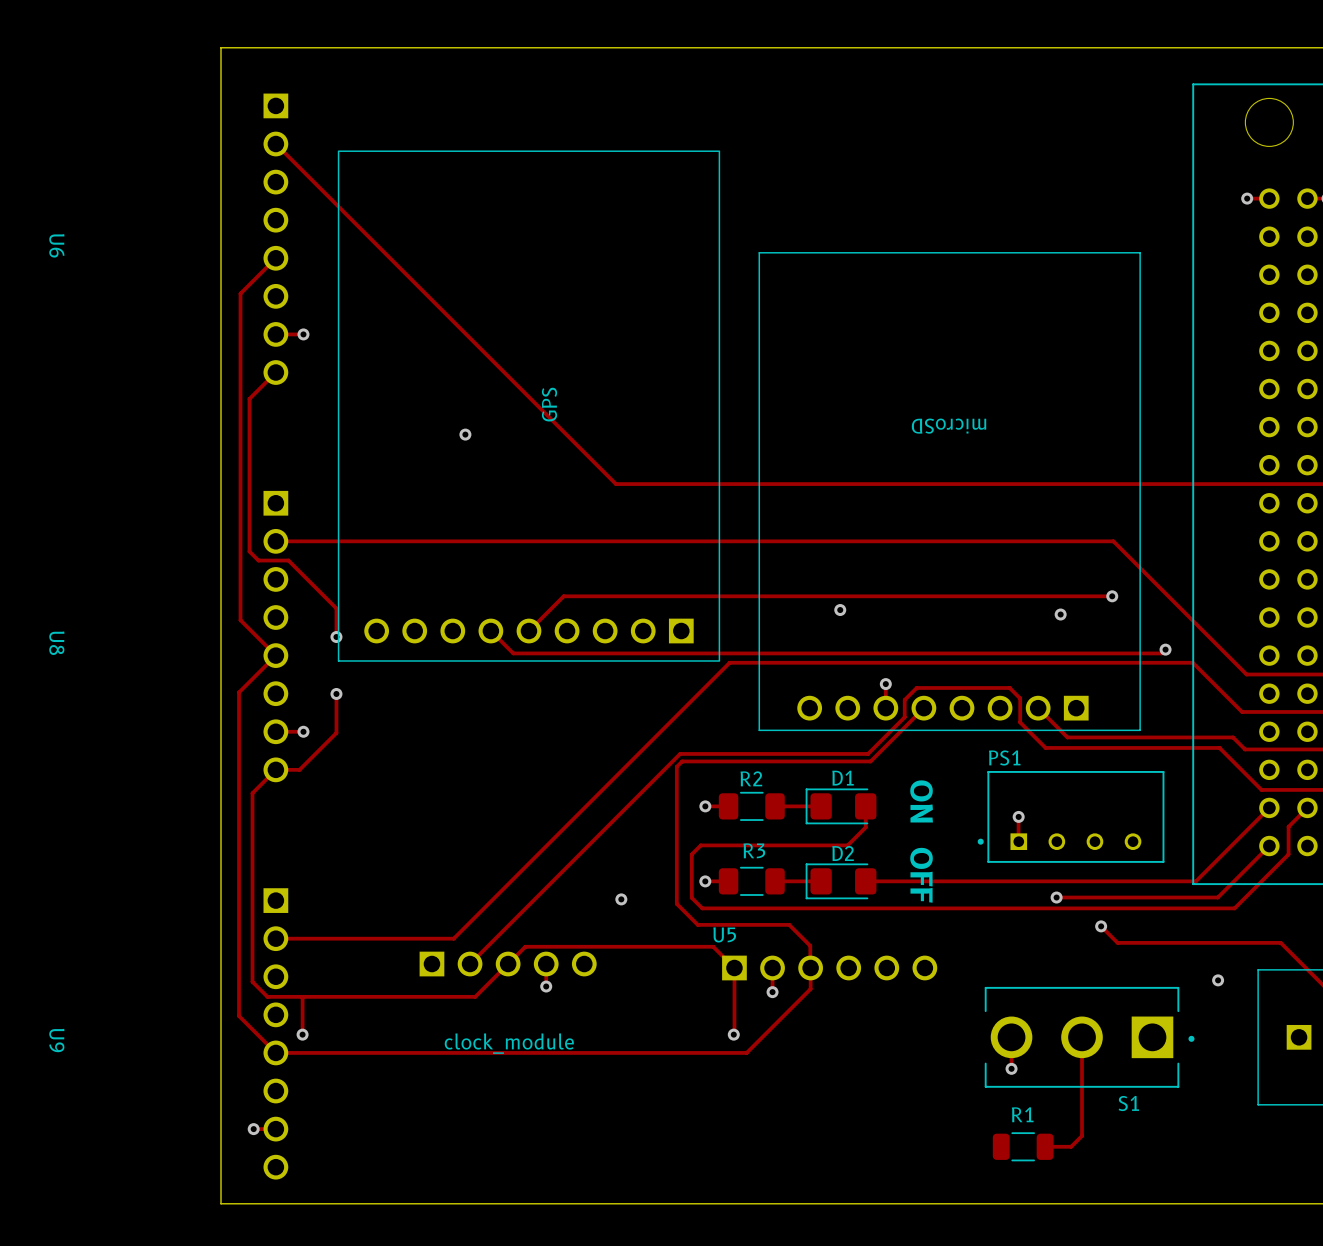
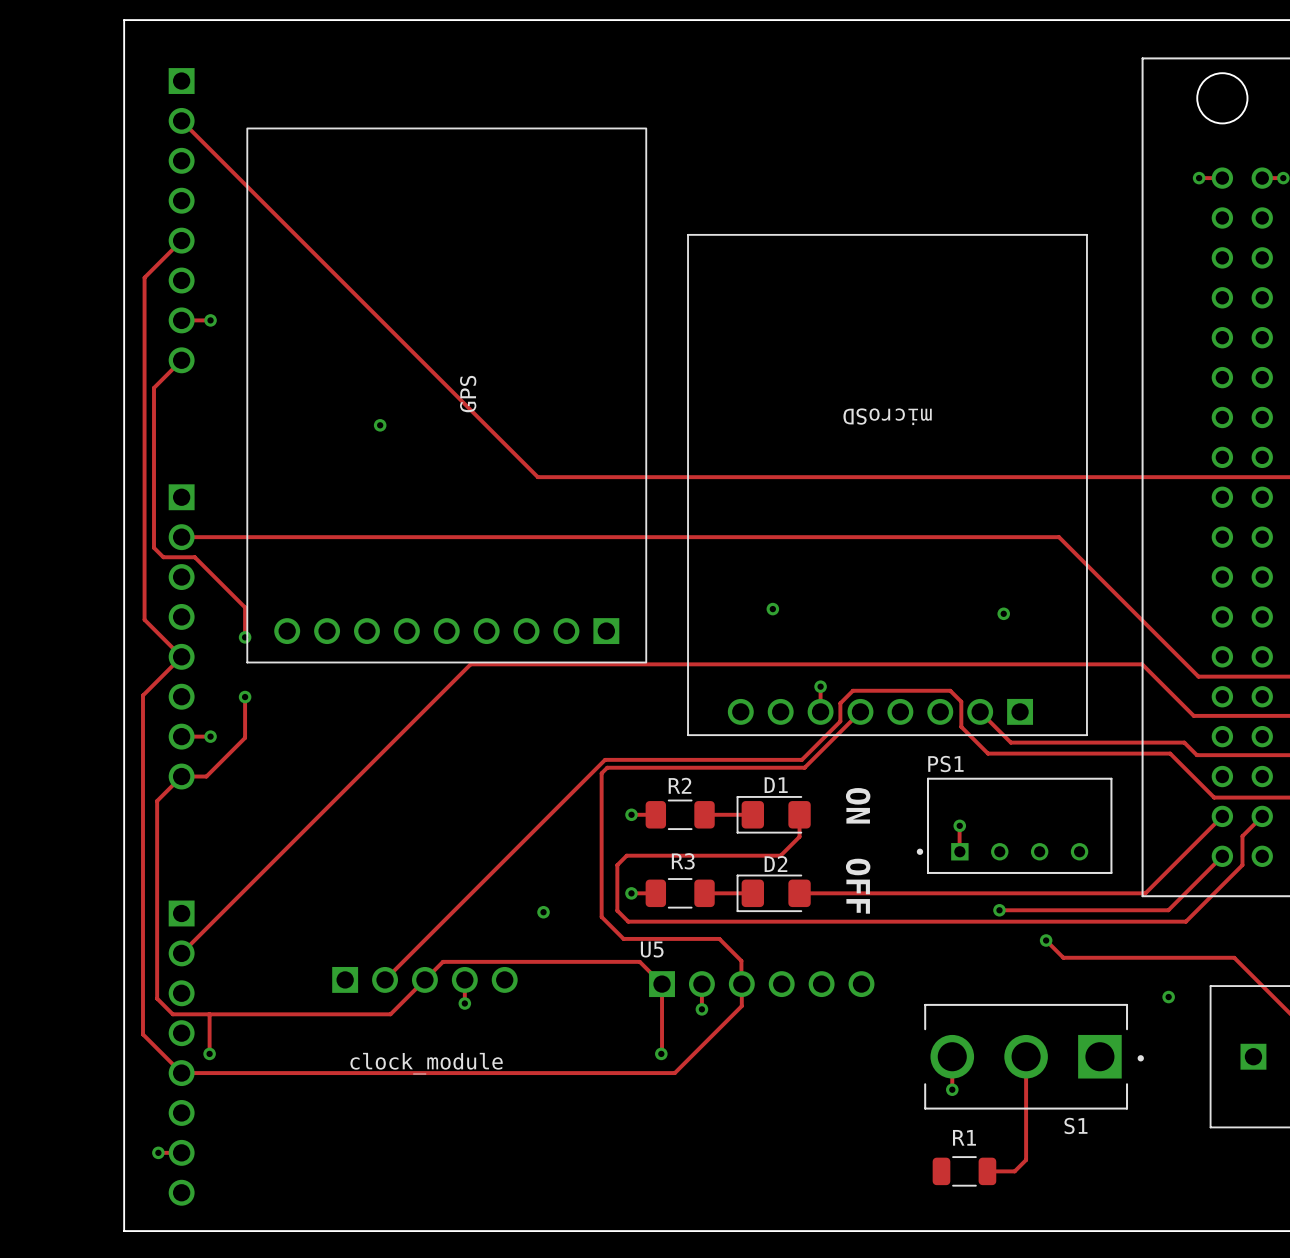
track: (1112, 596) (563, 596) (528, 631) -> none
via: (1112, 596) -> none
track: (490, 631) (513, 653) (1161, 653) (1166, 648) -> none
via: (1165, 649) -> none
track: (729, 662) (453, 938) (275, 938) -> (657, 664) (470, 664) (181, 953)

